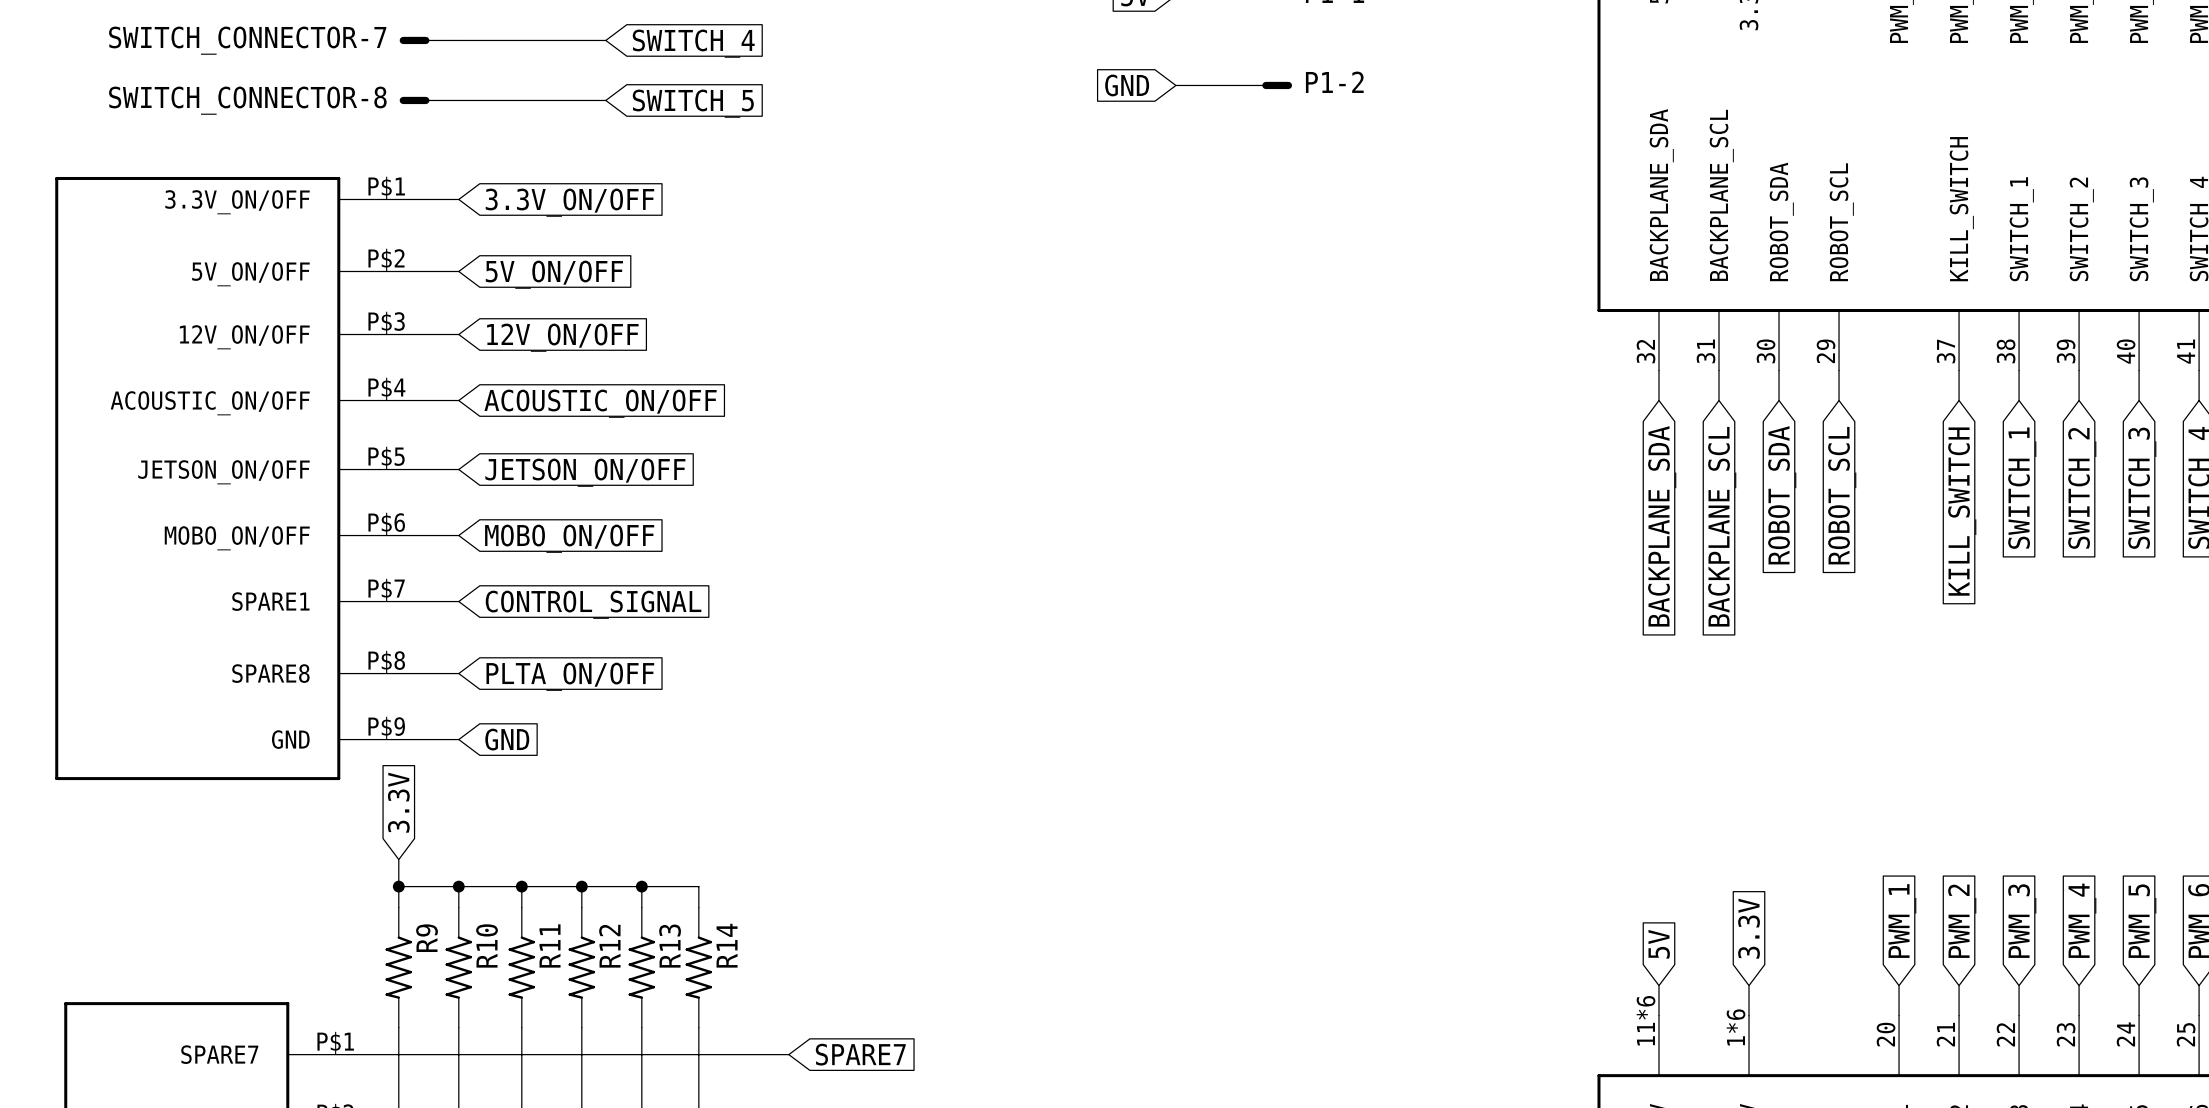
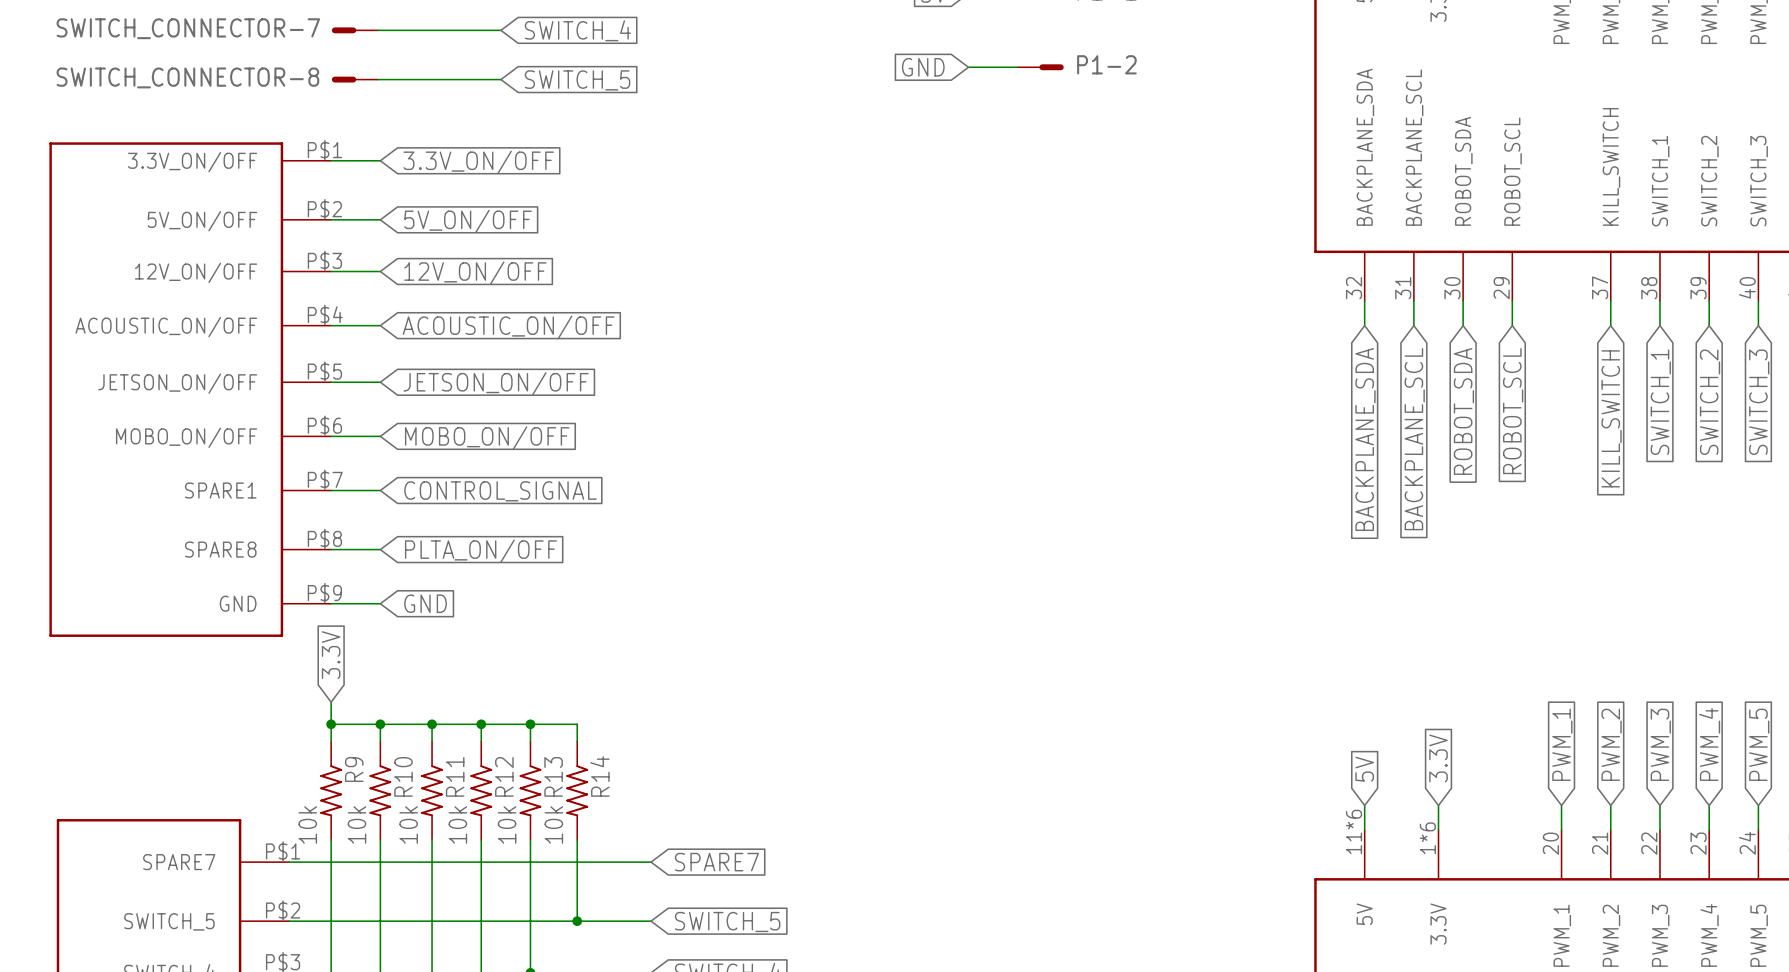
R9 value: none -> 10k (307, 824)
R10 value: none -> 10k (356, 824)
R11 value: none -> 10k (408, 824)
R12 value: none -> 10k (457, 824)
R13 value: none -> 10k (507, 824)
R14 value: none -> 10k (553, 824)

